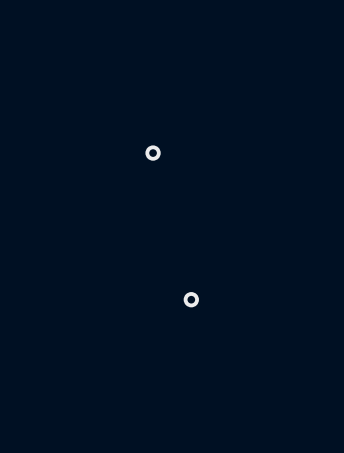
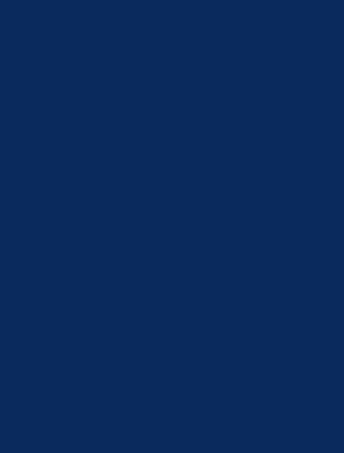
via: (153, 153) -> none
via: (191, 299) -> none

